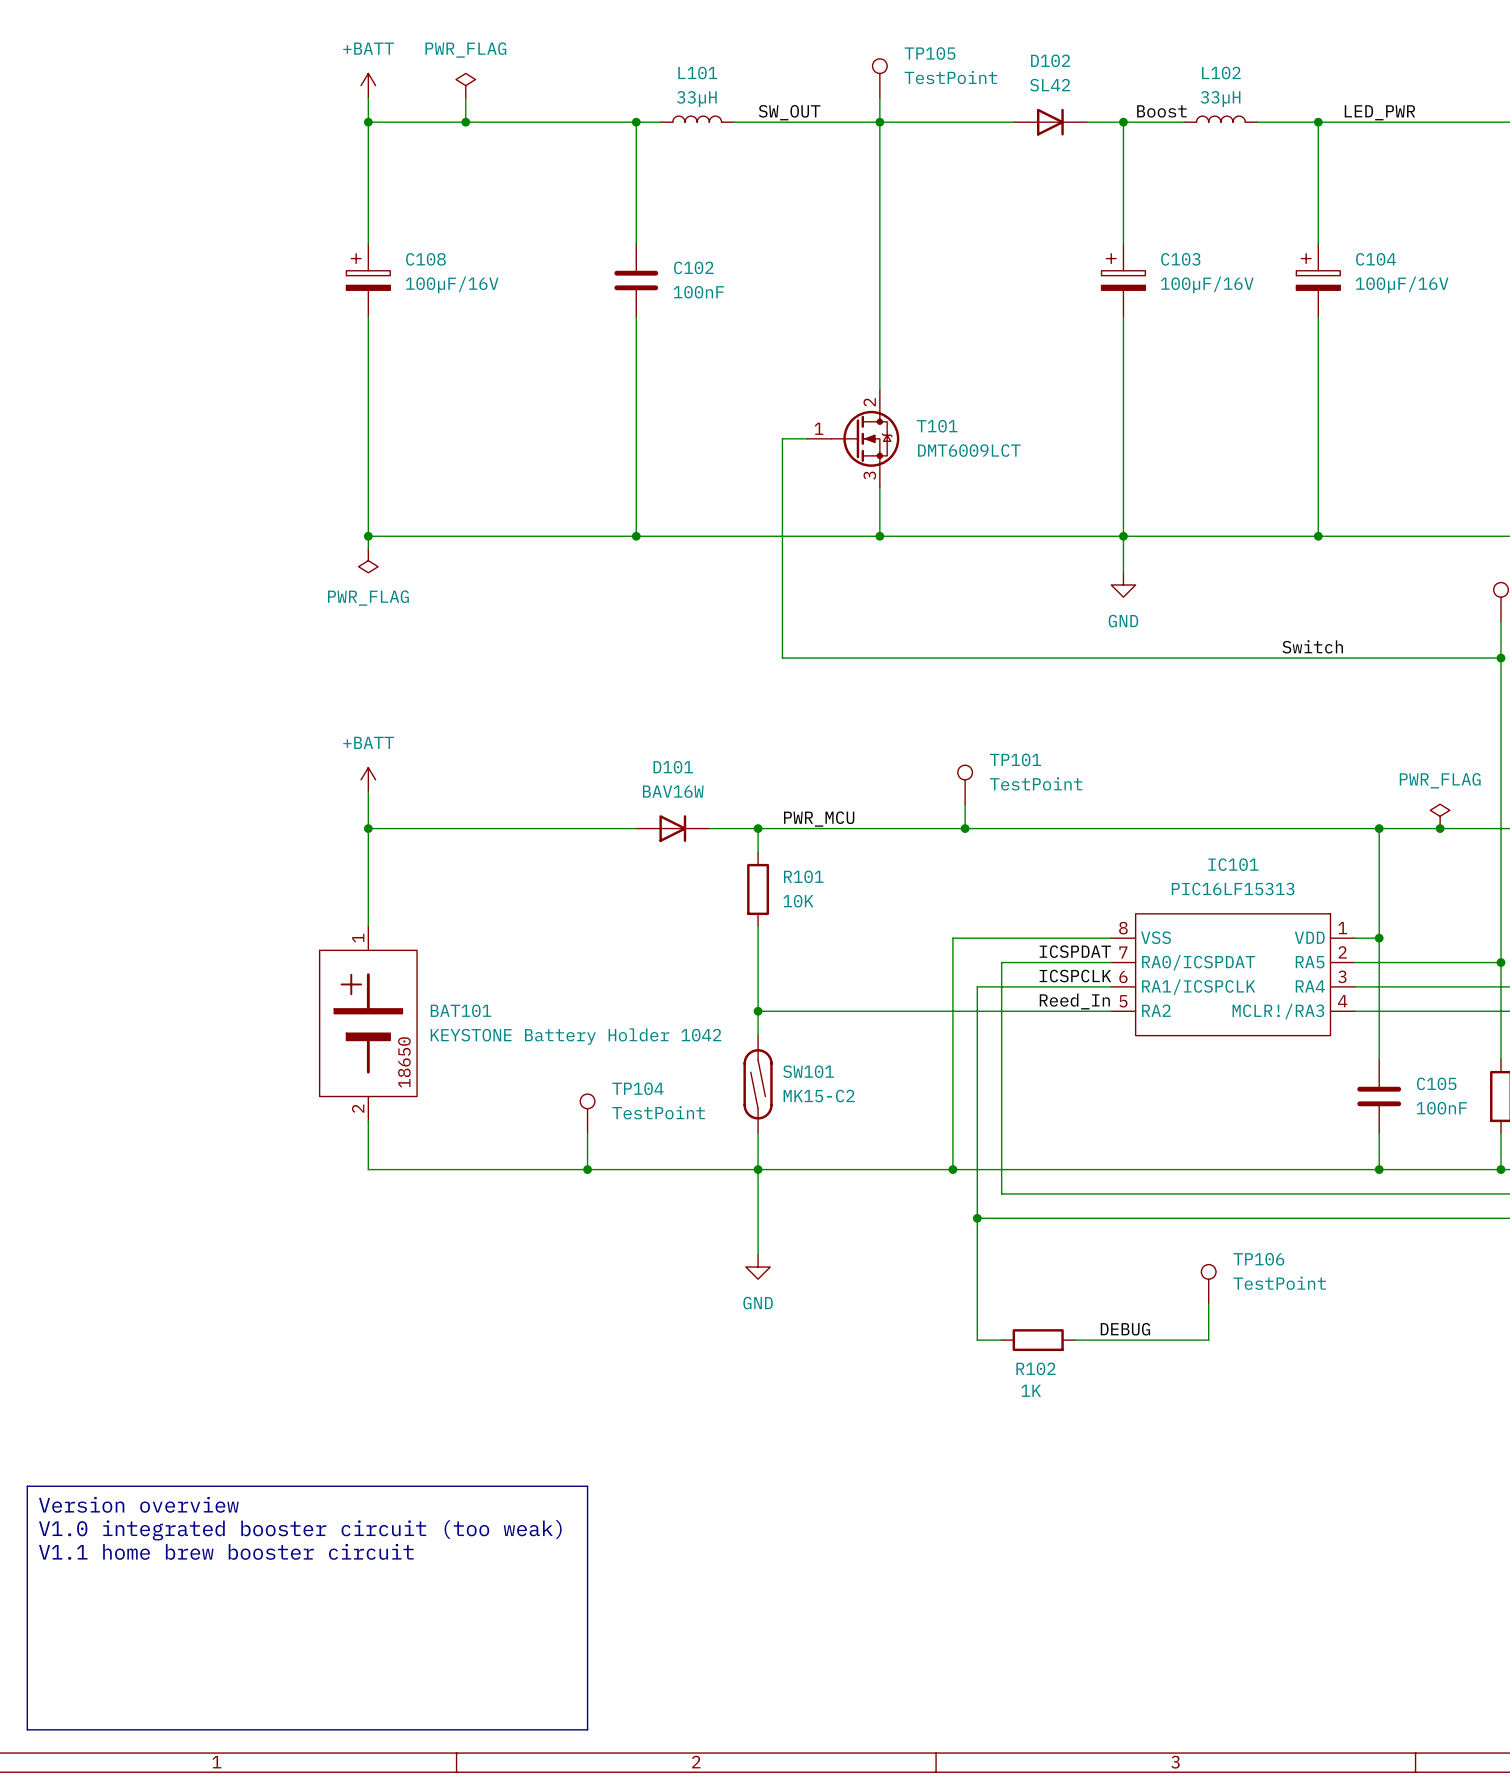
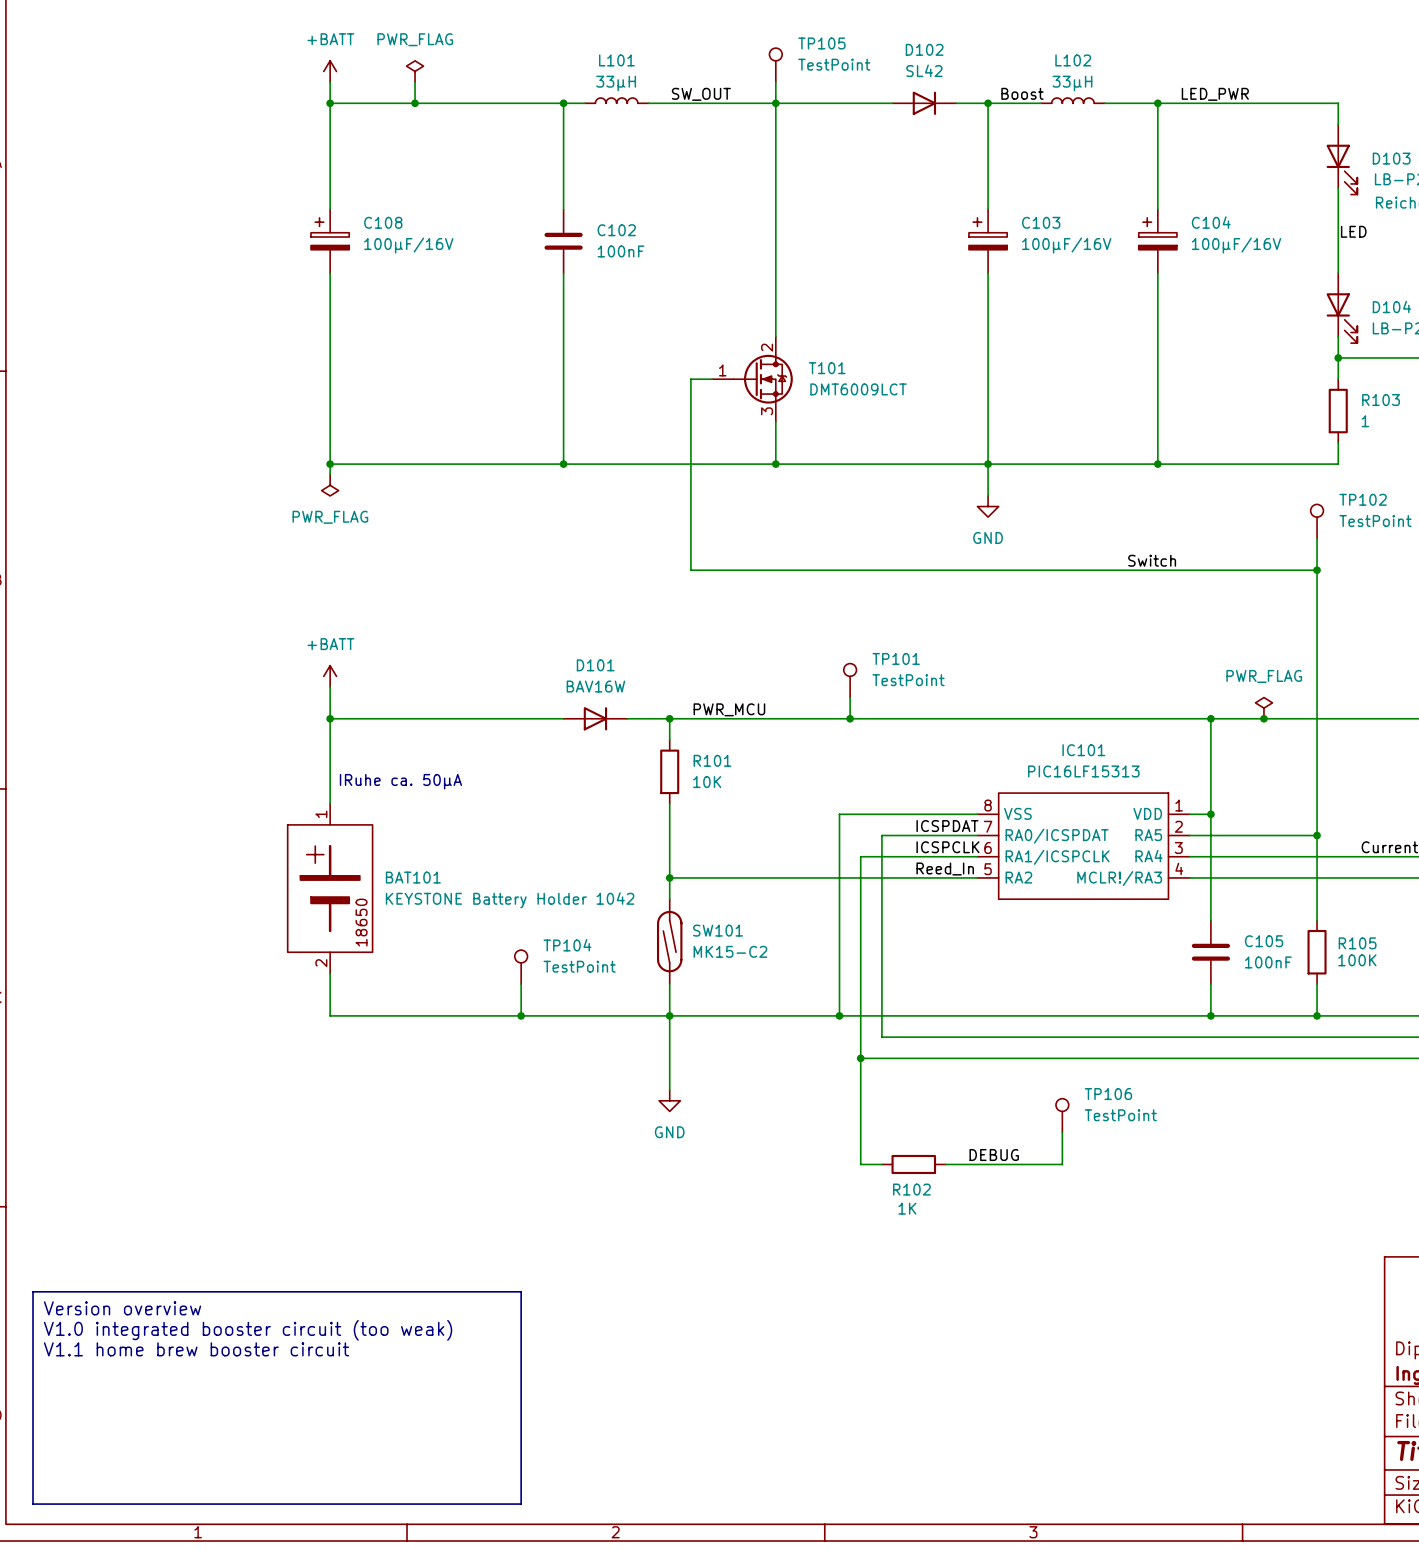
text: none -> IRuhe ca. 50µA (400, 781)

